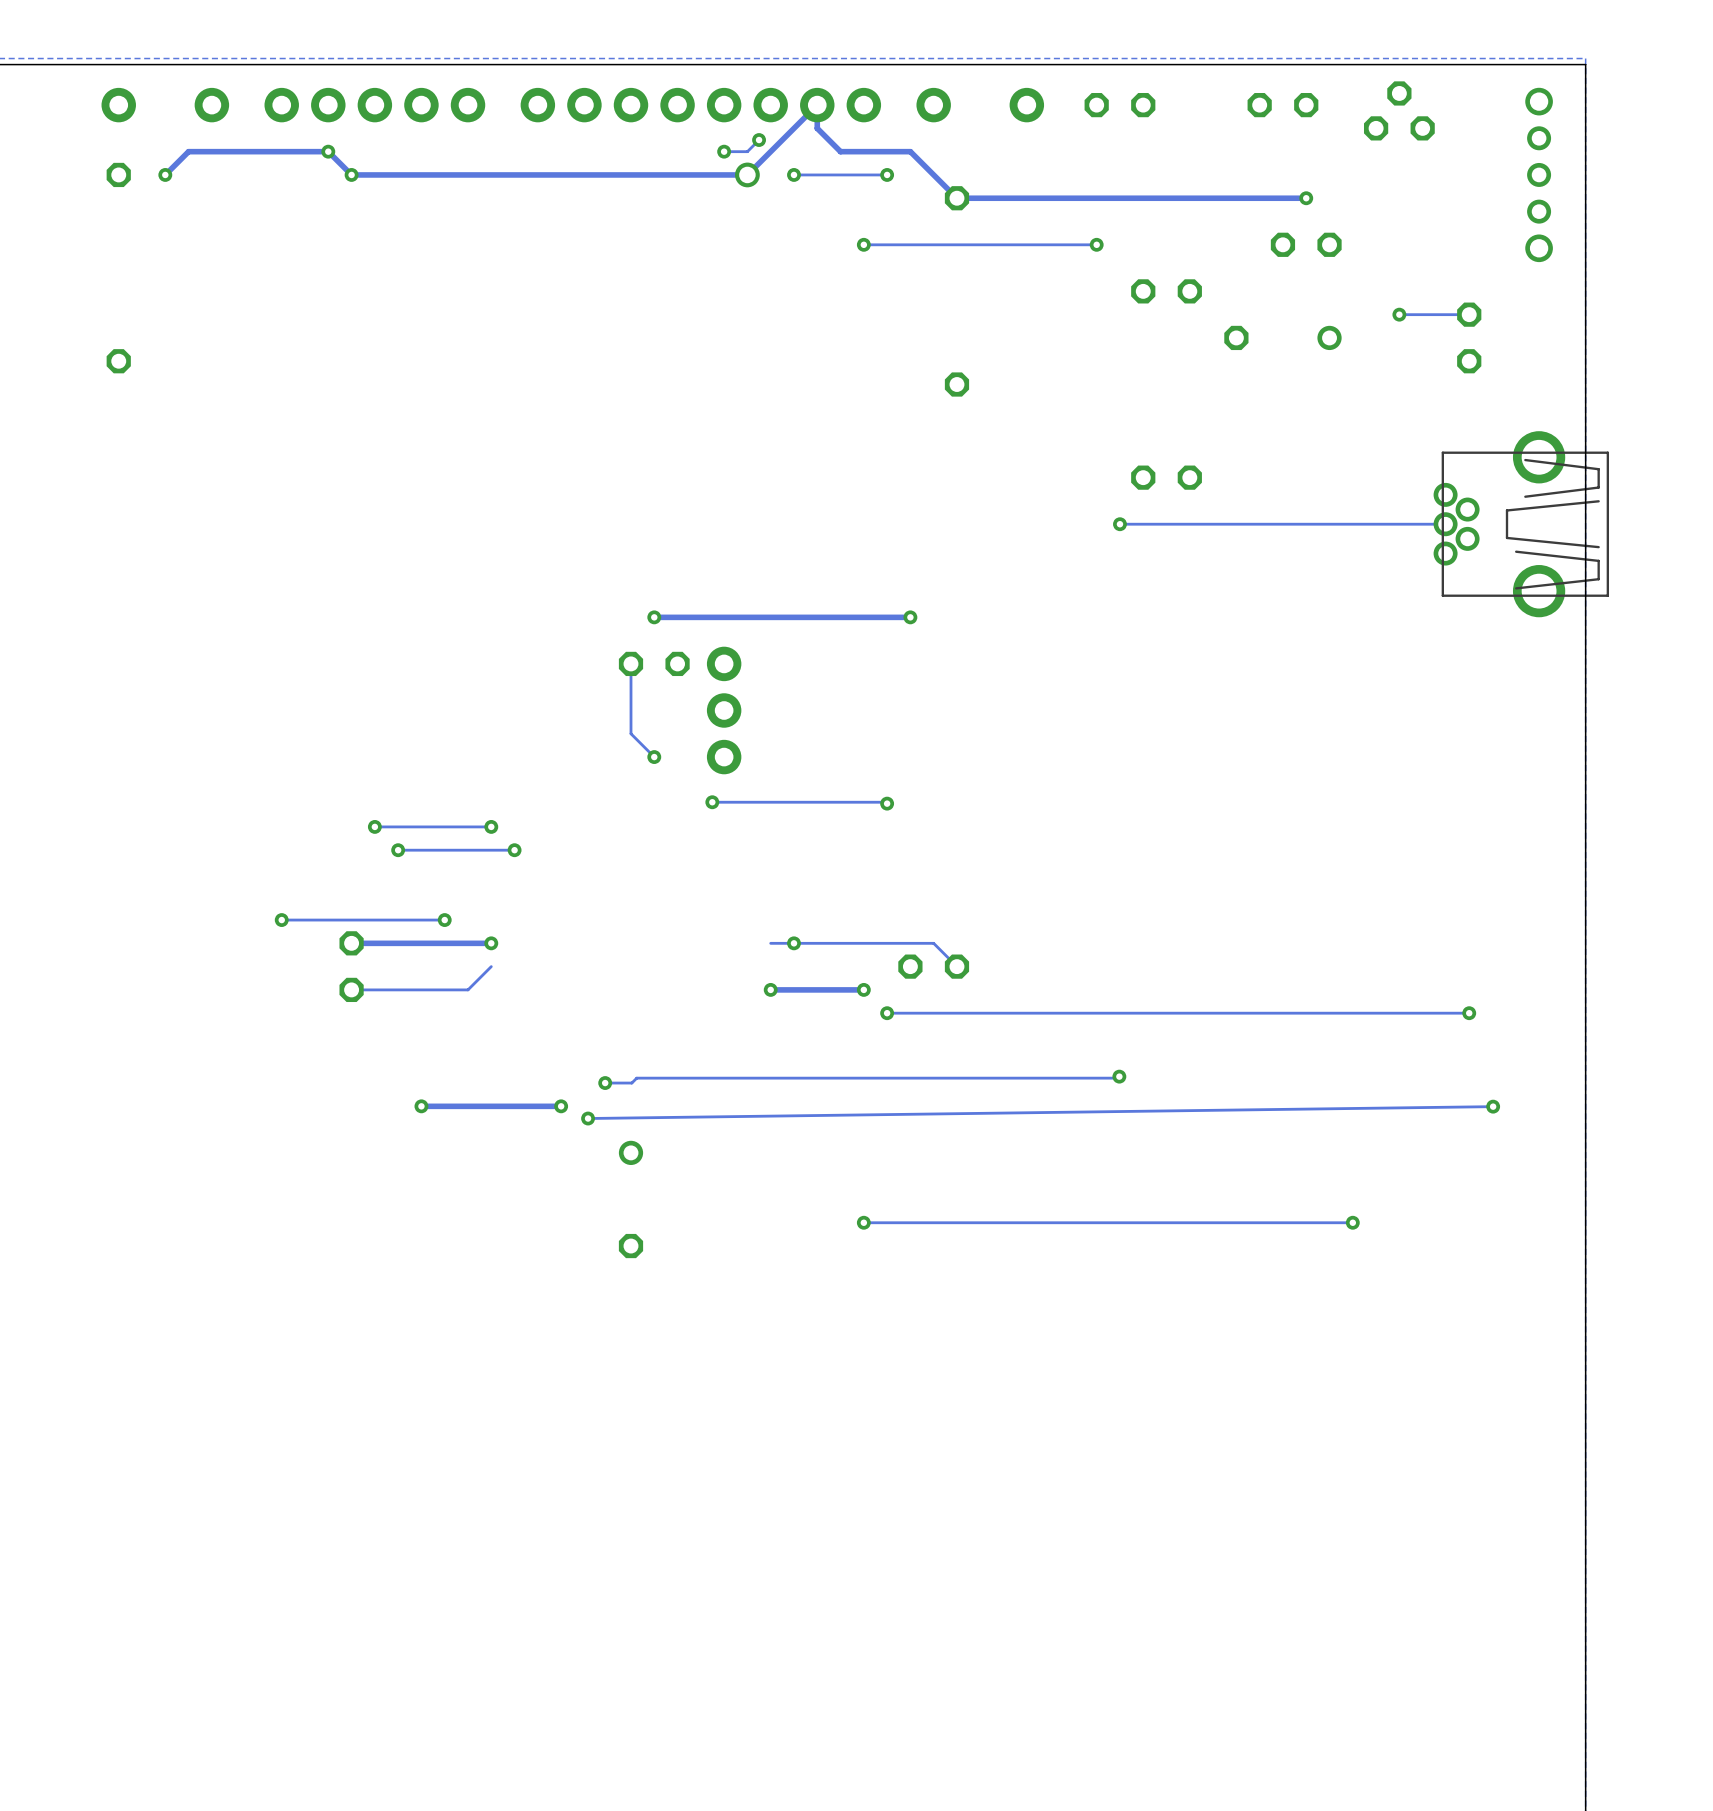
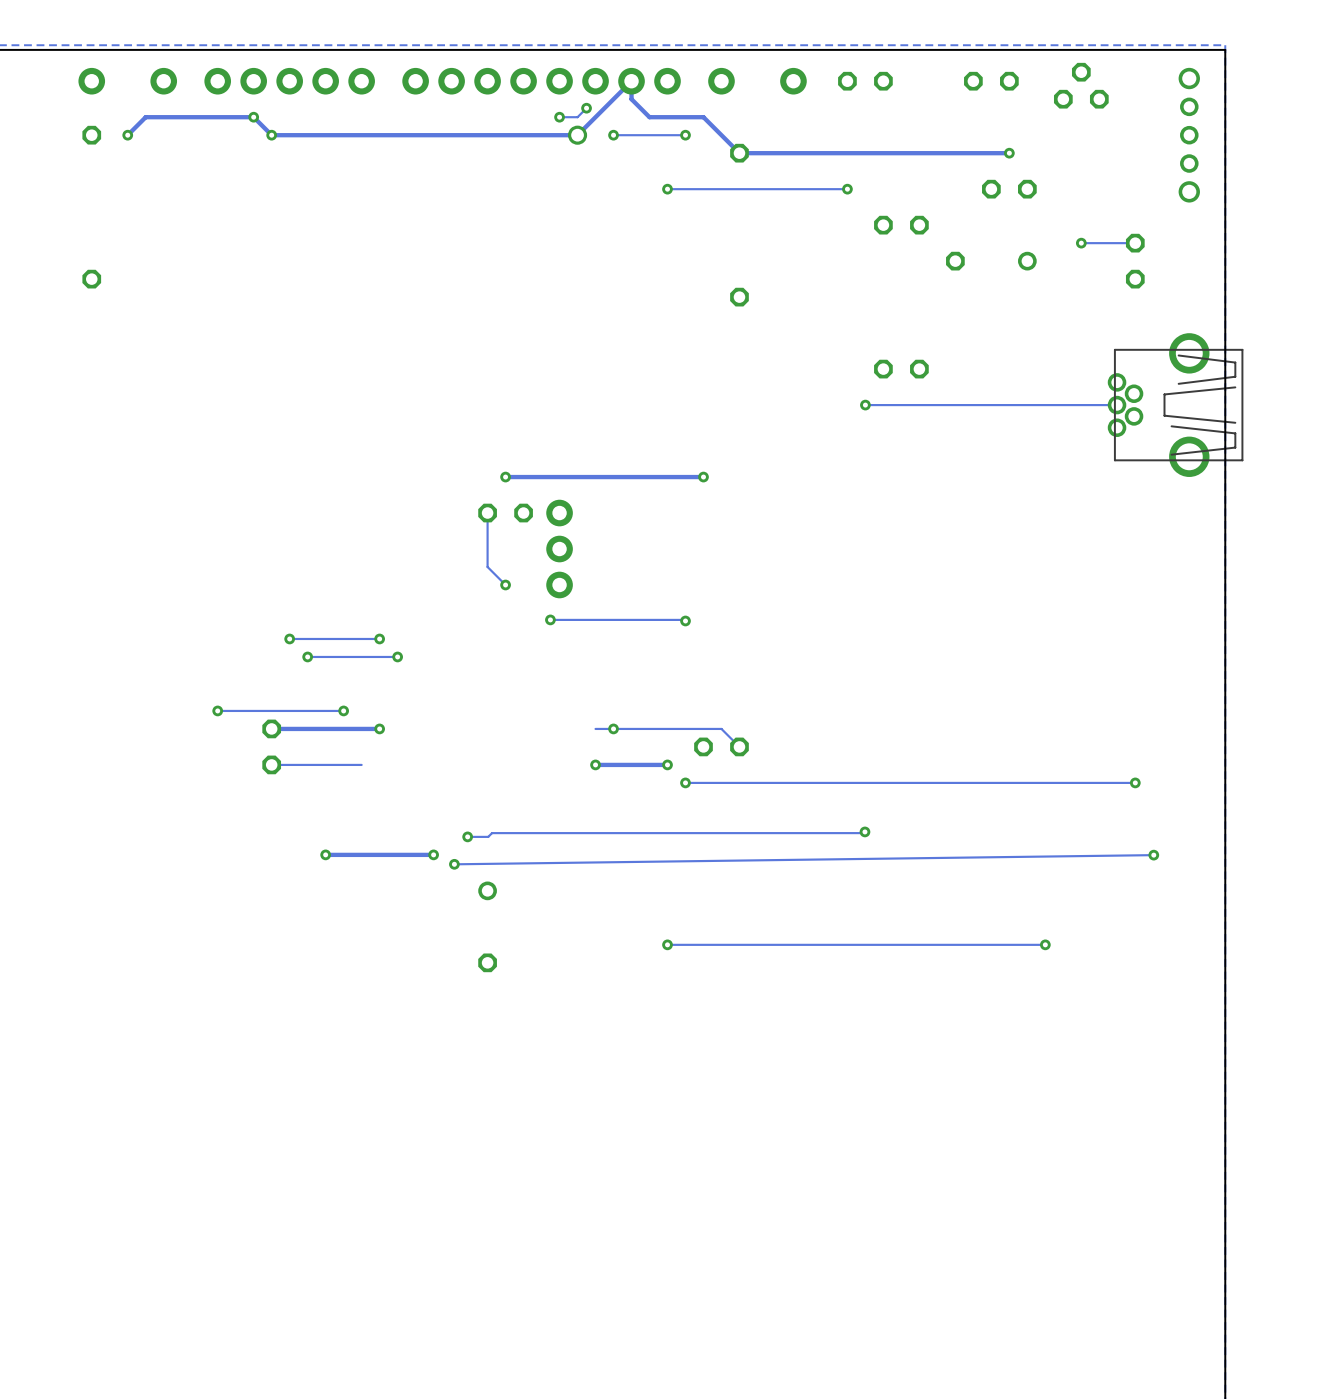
track: (491, 966) (468, 989) -> none

